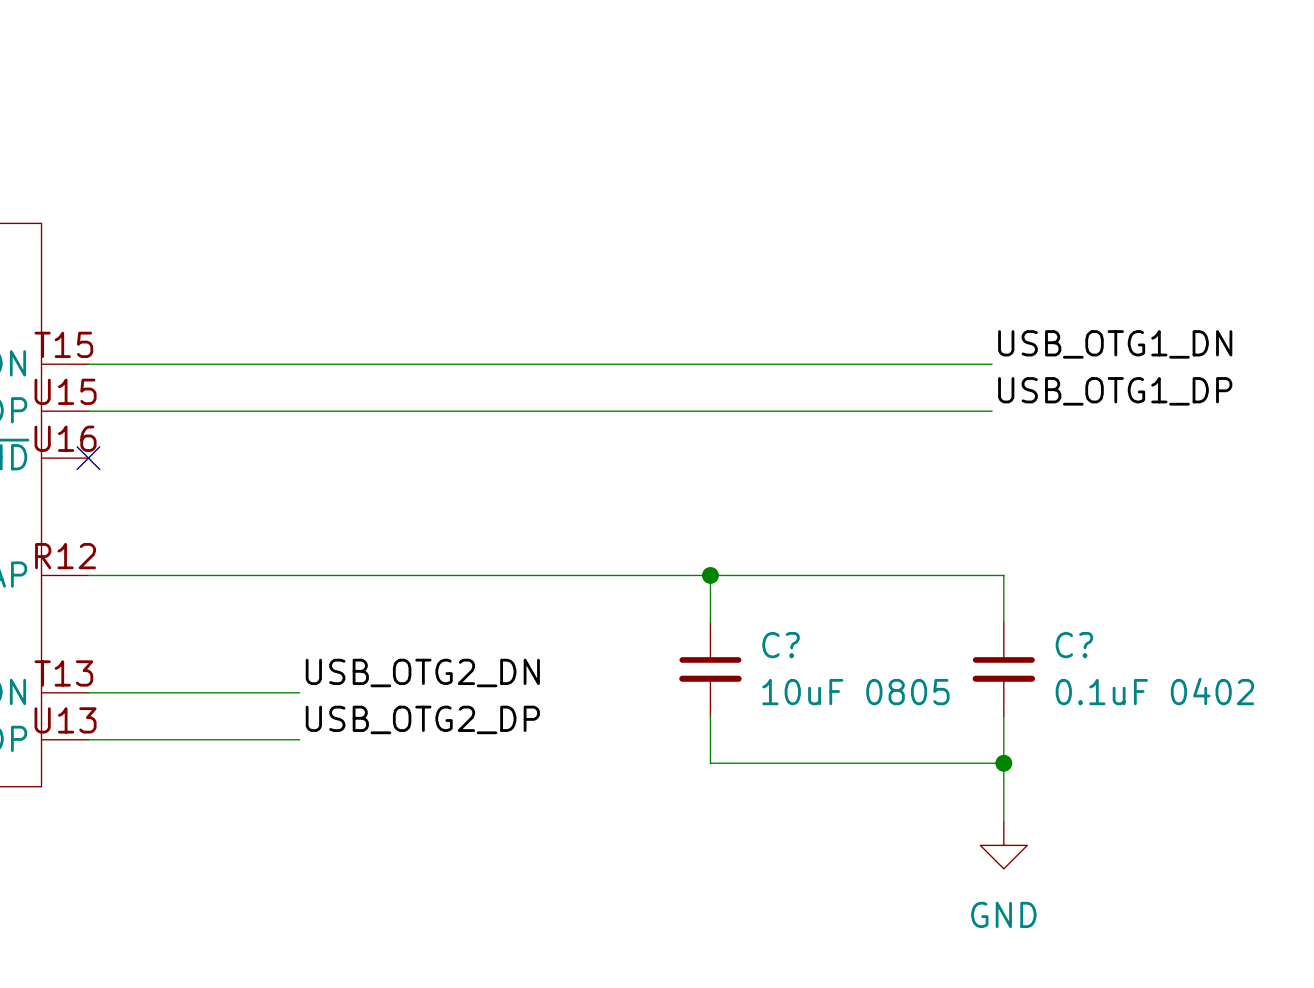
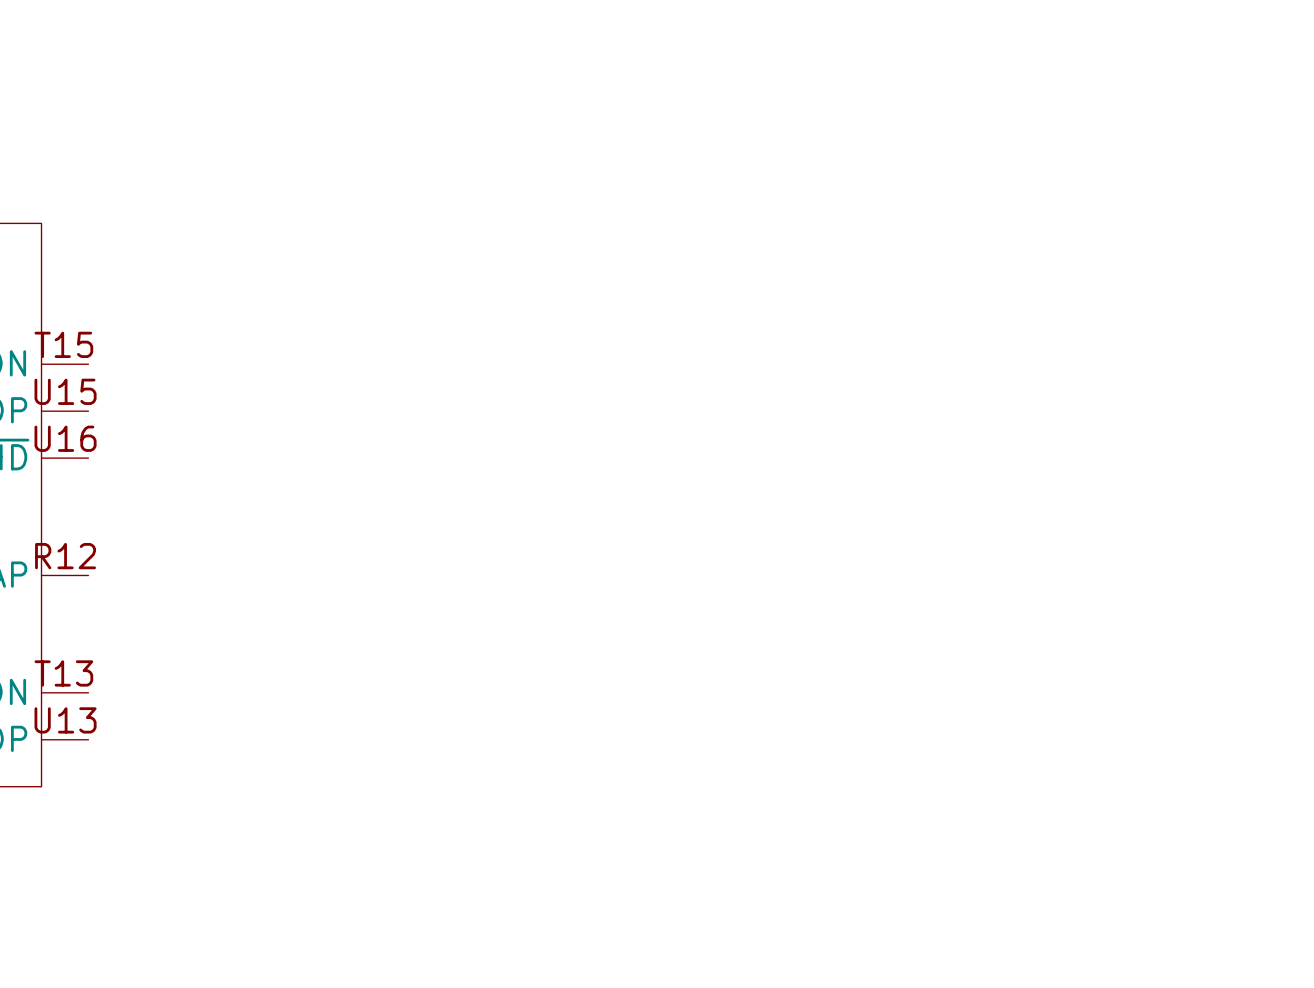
label: USB_OTG1_DN (1115, 344) -> none
wire: (88, 364) (992, 364) -> none
label: USB_OTG1_DP (1115, 391) -> none
wire: (88, 411) (992, 411) -> none
no-connect mark: (88, 458) -> none
wire: (88, 575) (1003, 575) (1003, 622) -> none
wire: (710, 575) (710, 622) -> none
junction: (710, 575) -> none
C?: 10uF 0805 (710, 669) -> none
C?: 0.1uF 0402 (1003, 669) -> none
label: USB_OTG2_DN (422, 673) -> none
wire: (88, 692) (299, 692) -> none
wire: (710, 716) (710, 763) (1003, 763) -> none
wire: (1003, 716) (1003, 821) -> none
label: USB_OTG2_DP (422, 719) -> none
wire: (88, 739) (299, 739) -> none
junction: (1003, 763) -> none
power symbol: GND (1003, 845) -> none

